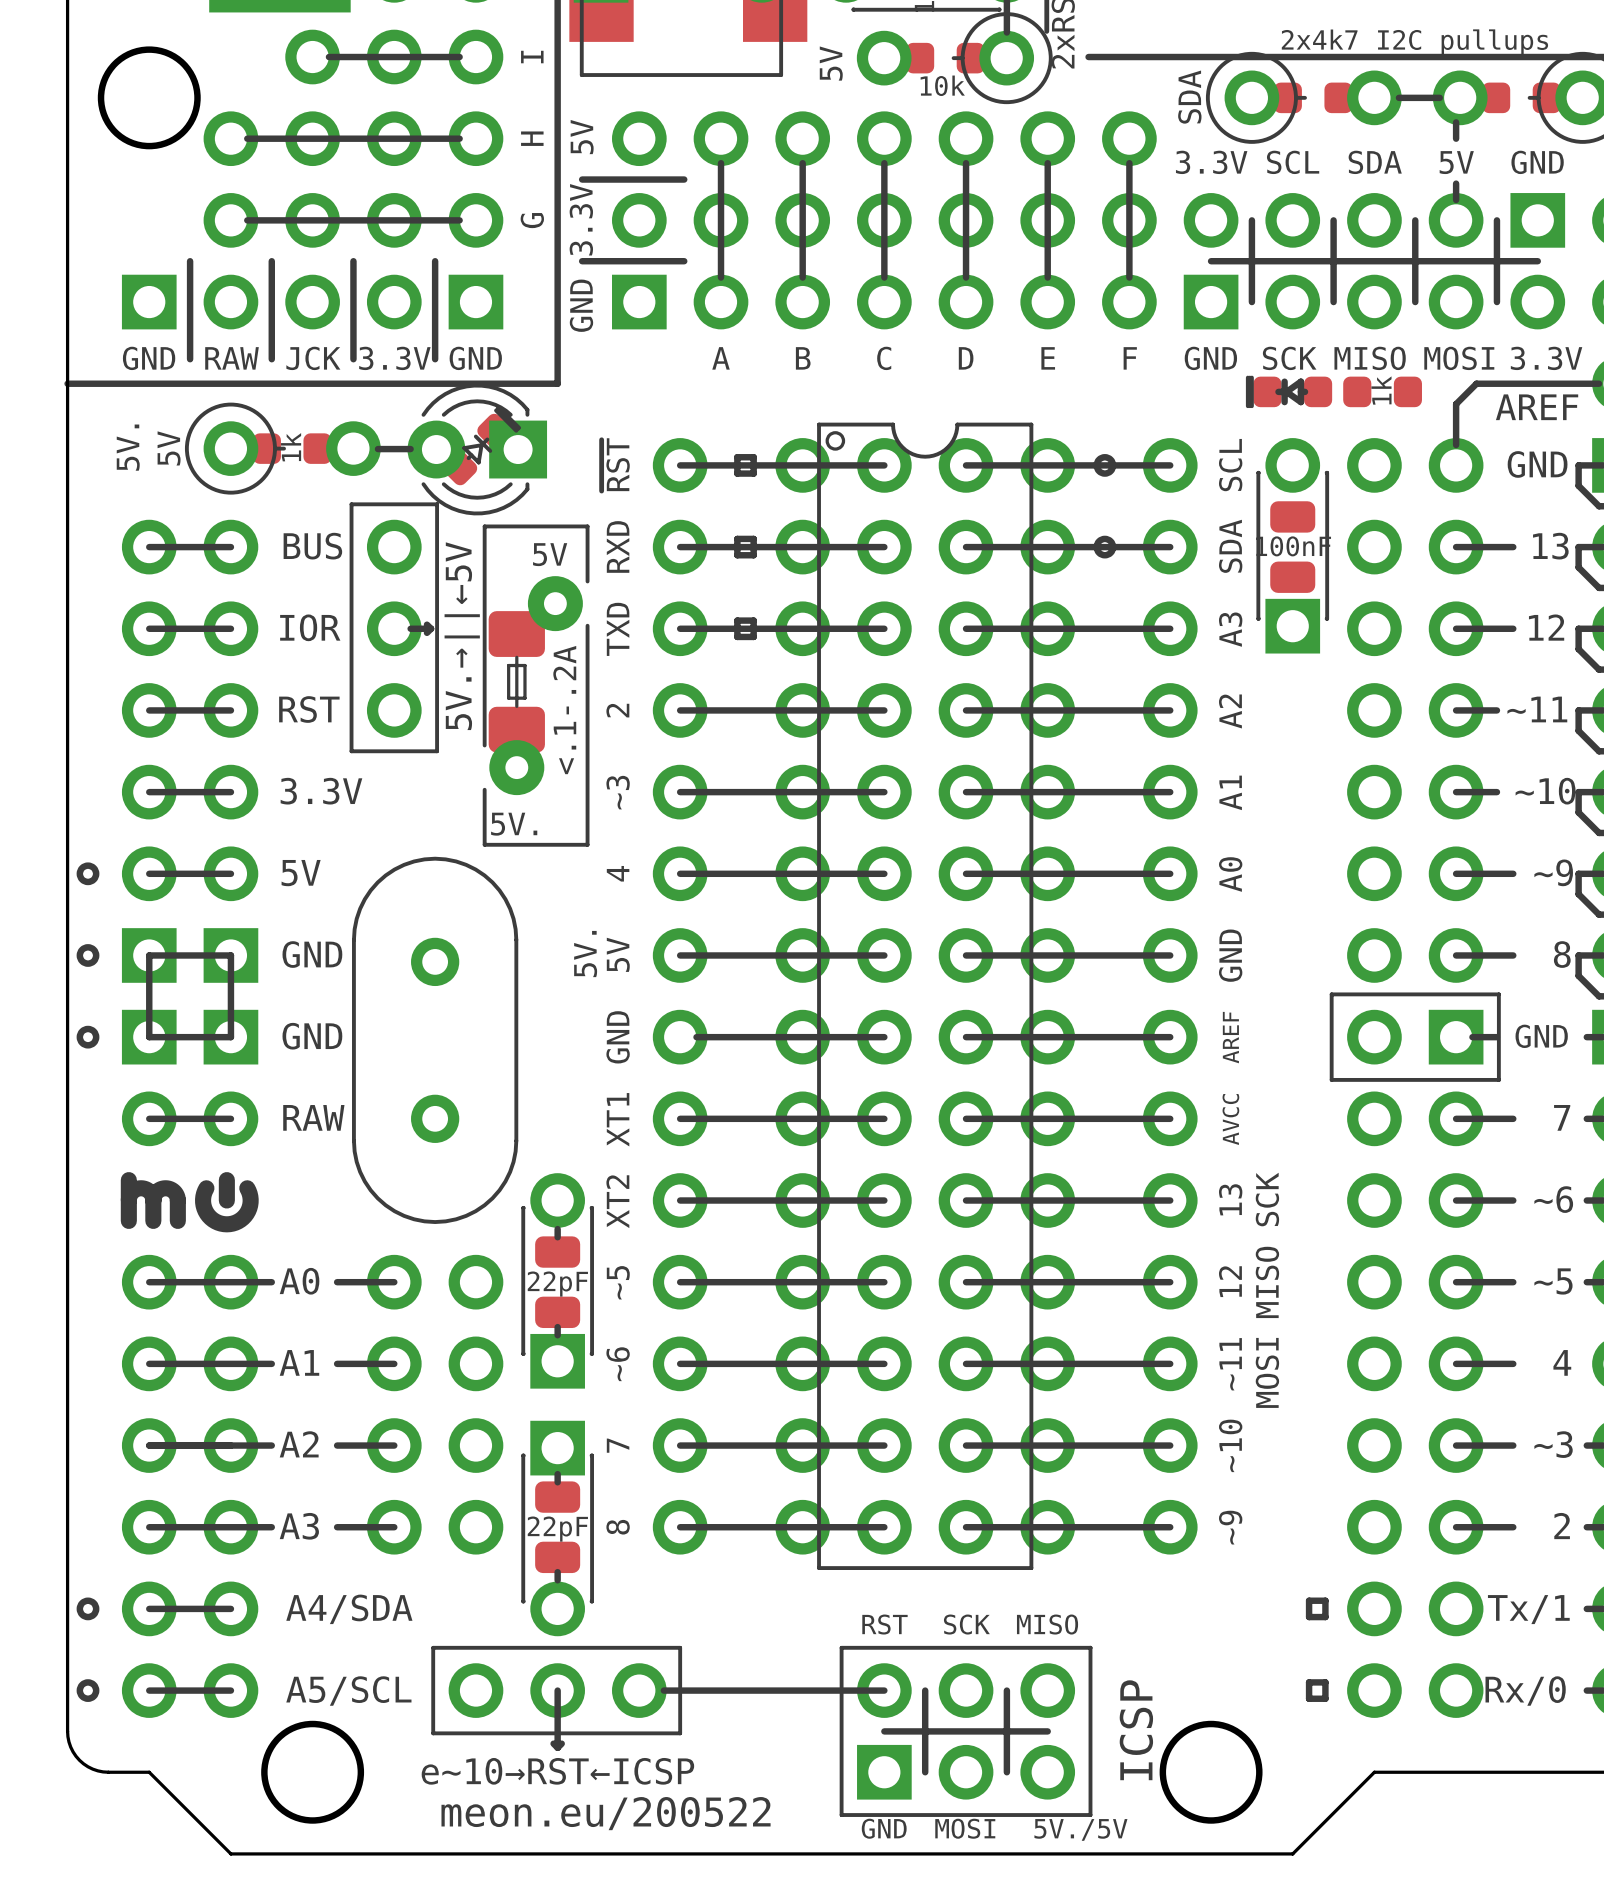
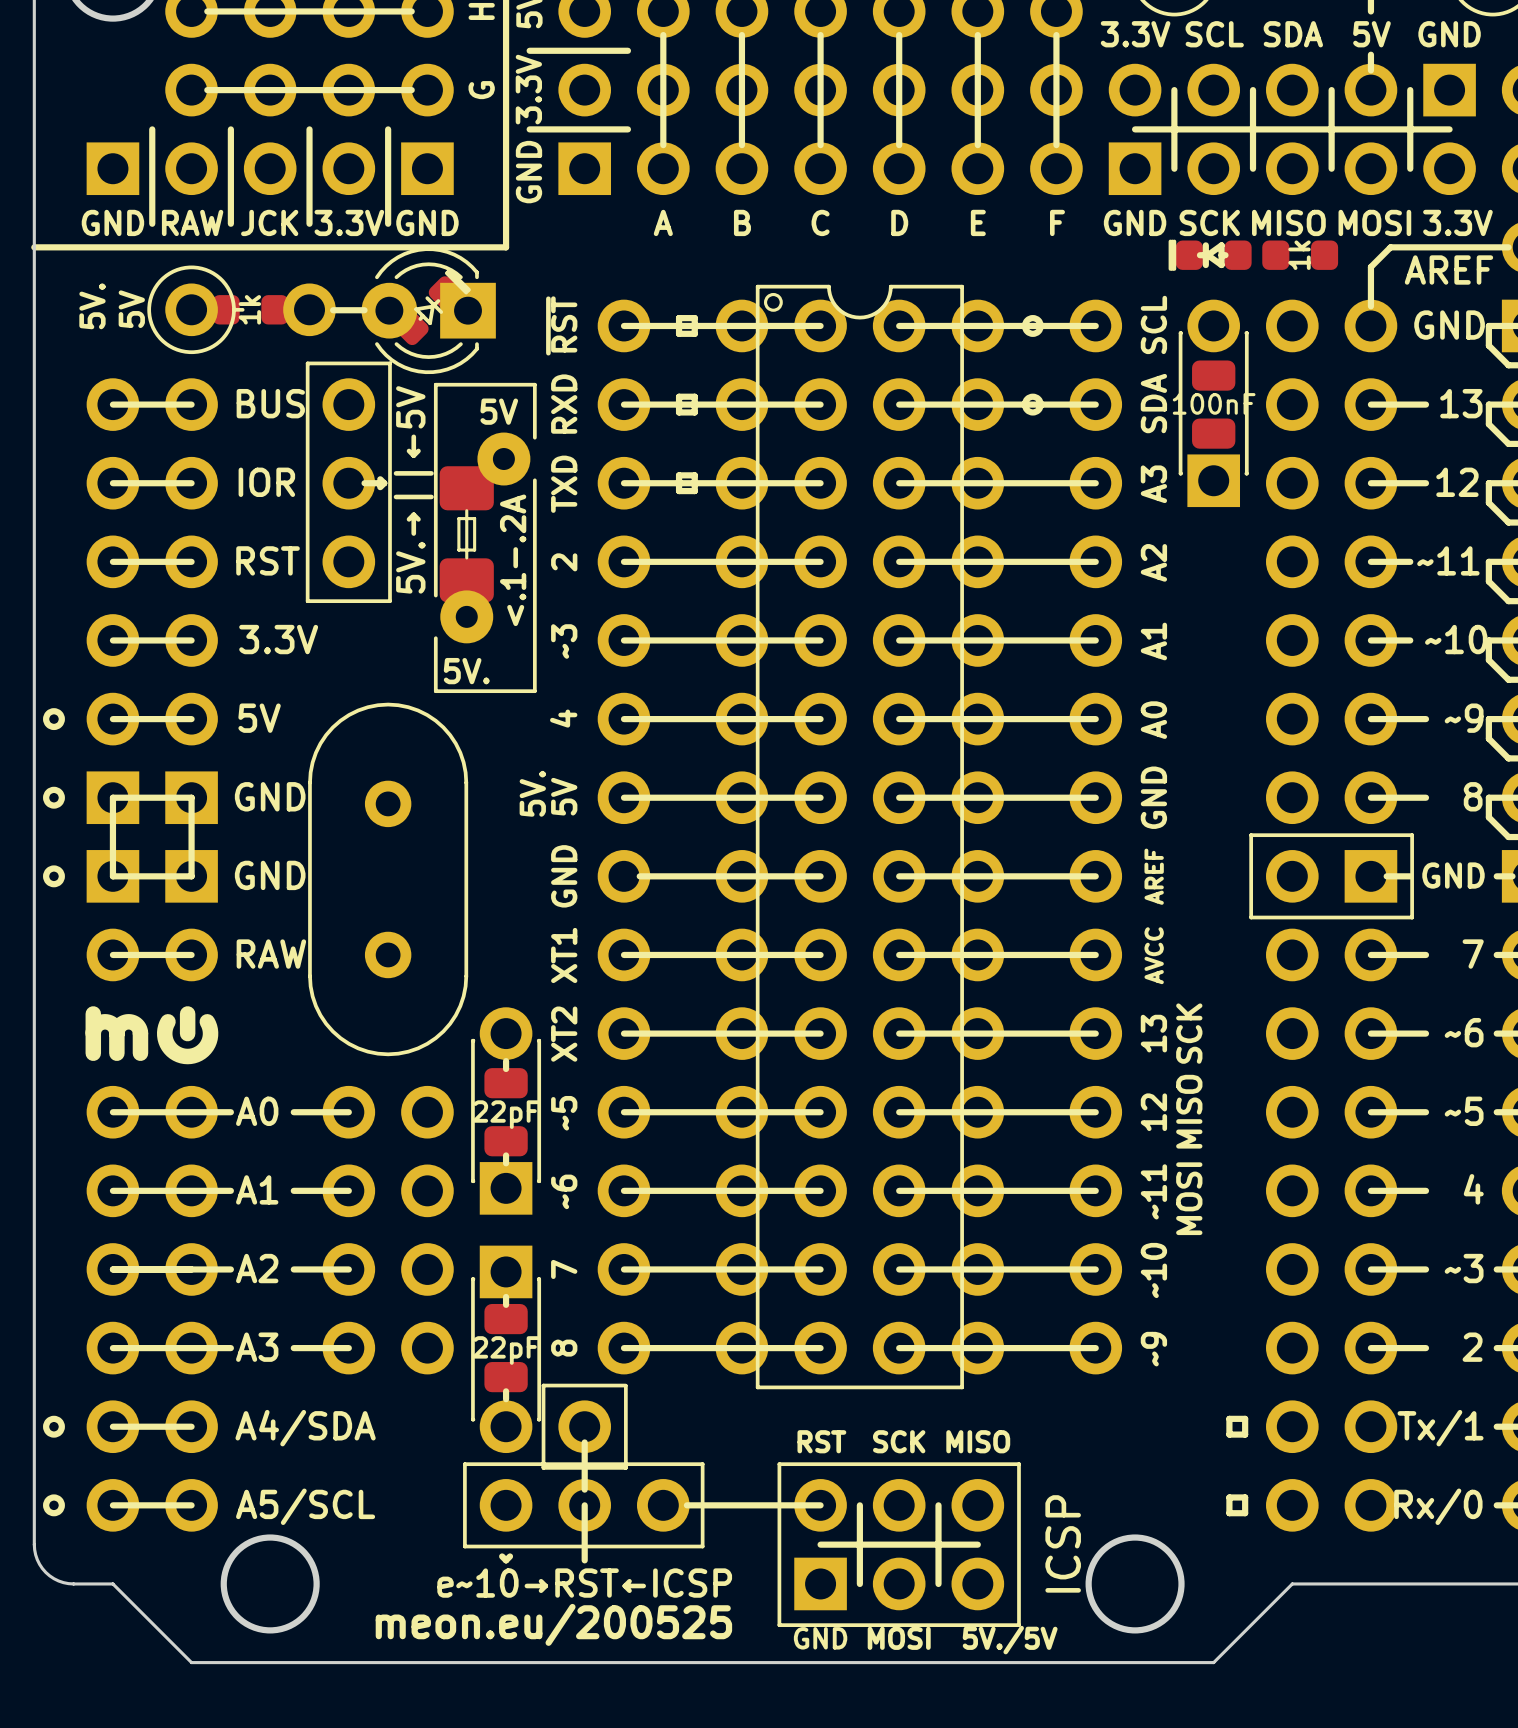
part: none -> (584, 1426)
line: none -> (584, 1442) (584, 1489)
part position: (556, 1690) -> (583, 1505)
line: (557, 1690) (557, 1747) -> (584, 1505) (584, 1560)
line: (663, 1690) (745, 1690) -> none
text position: e~10→RST←ICSP (557, 1771) -> e~10→RST←ICSP (584, 1583)
text: meon.eu/200522 (606, 1813) -> meon.eu/200525 (553, 1624)

